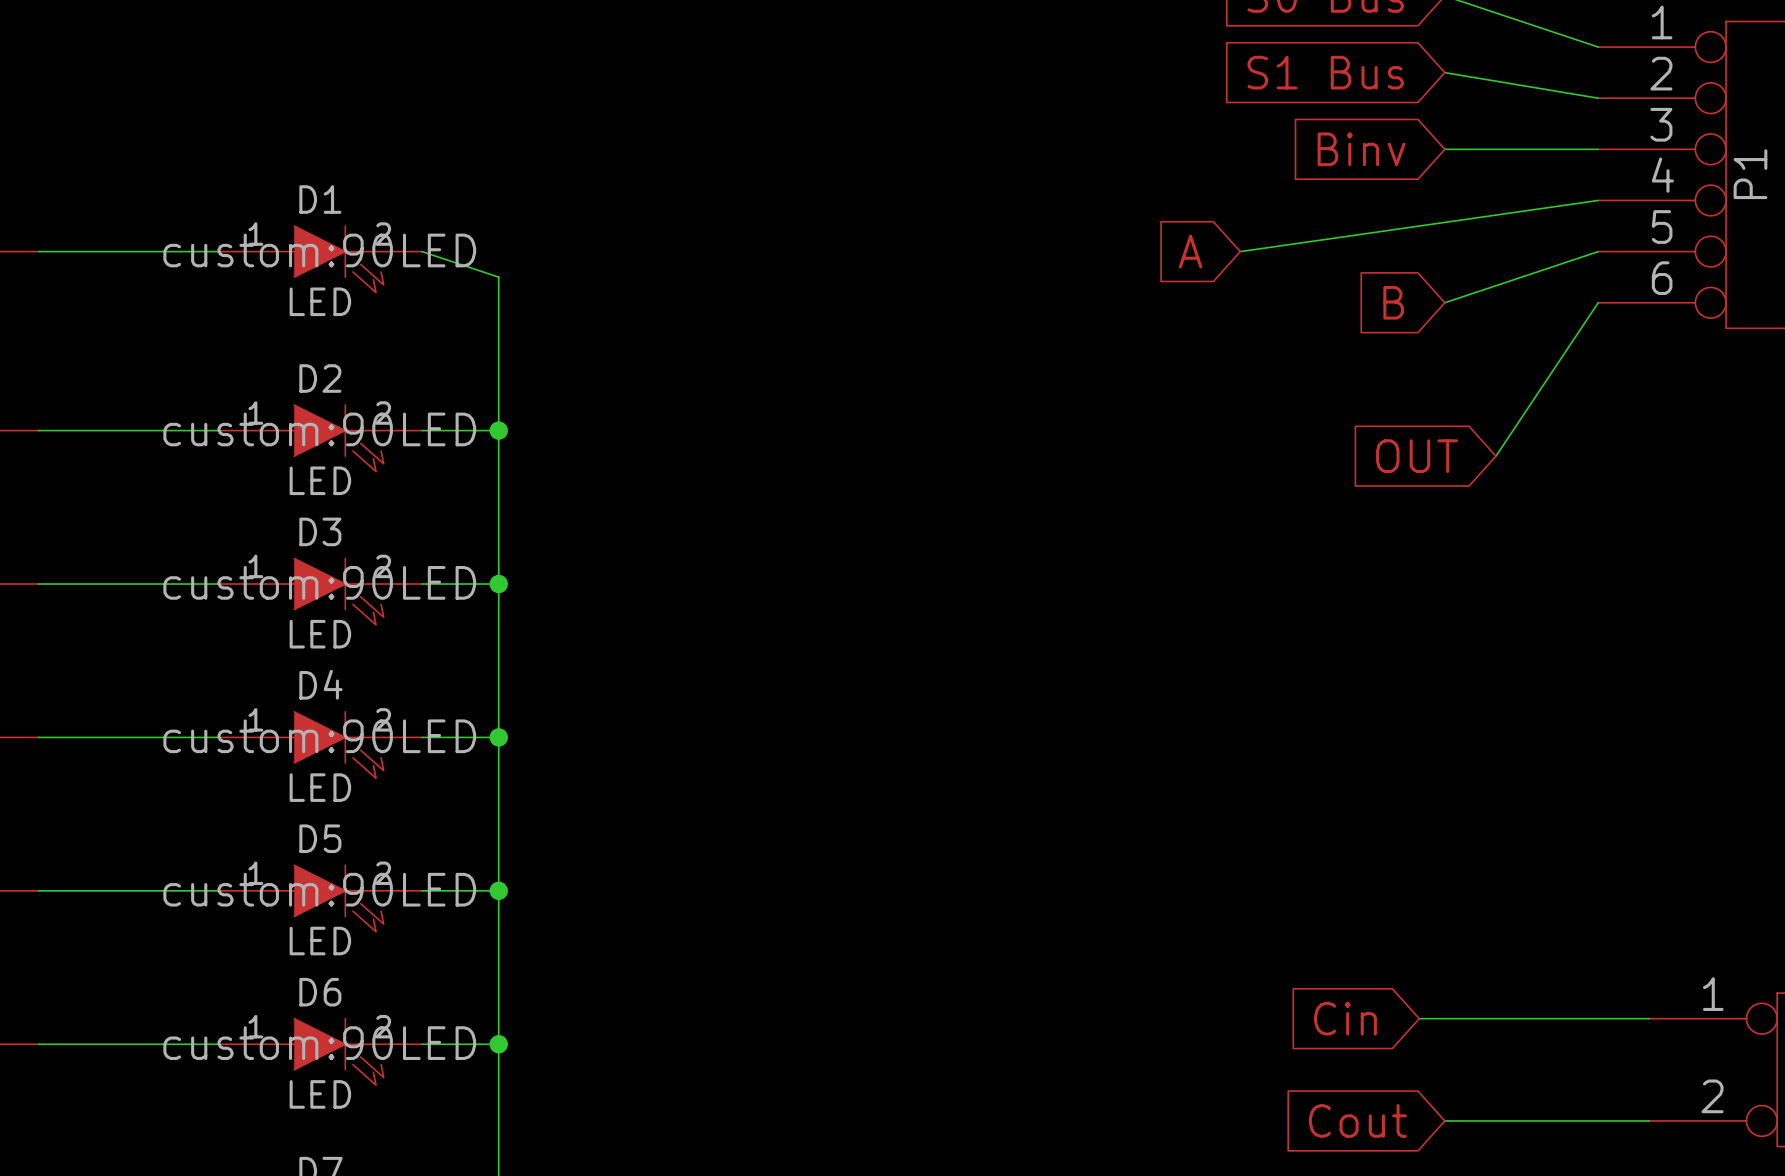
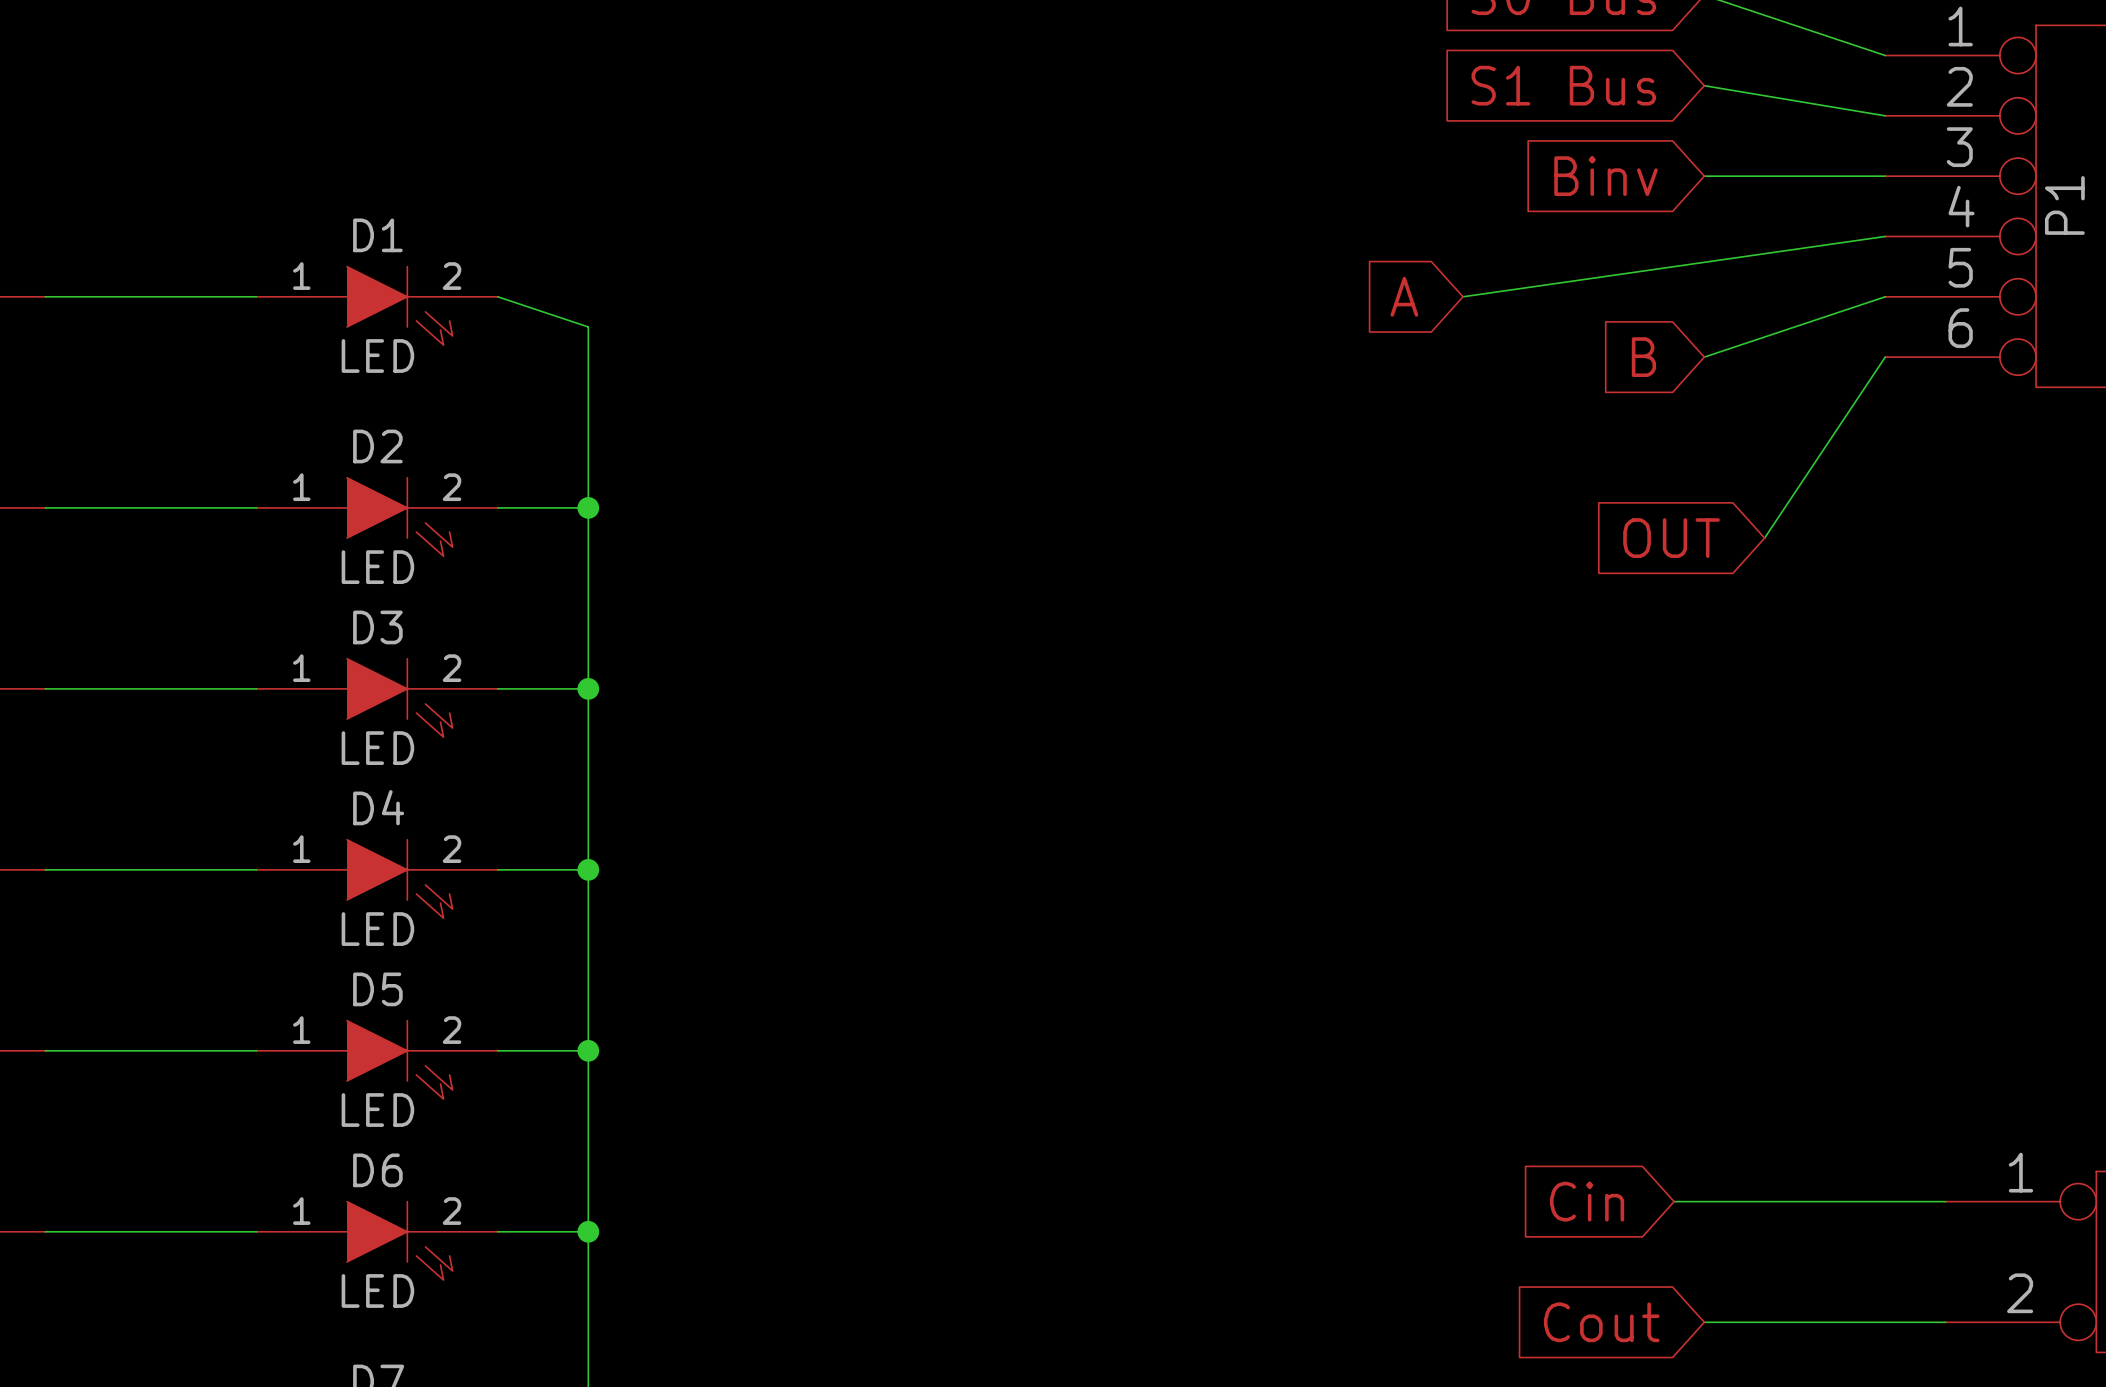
D1 text: custom:90LED (319, 250) -> none
D2 text: custom:90LED (319, 429) -> none
D3 text: custom:90LED (319, 582) -> none
D4 text: custom:90LED (319, 736) -> none
D5 text: custom:90LED (319, 889) -> none
D6 text: custom:90LED (319, 1043) -> none

